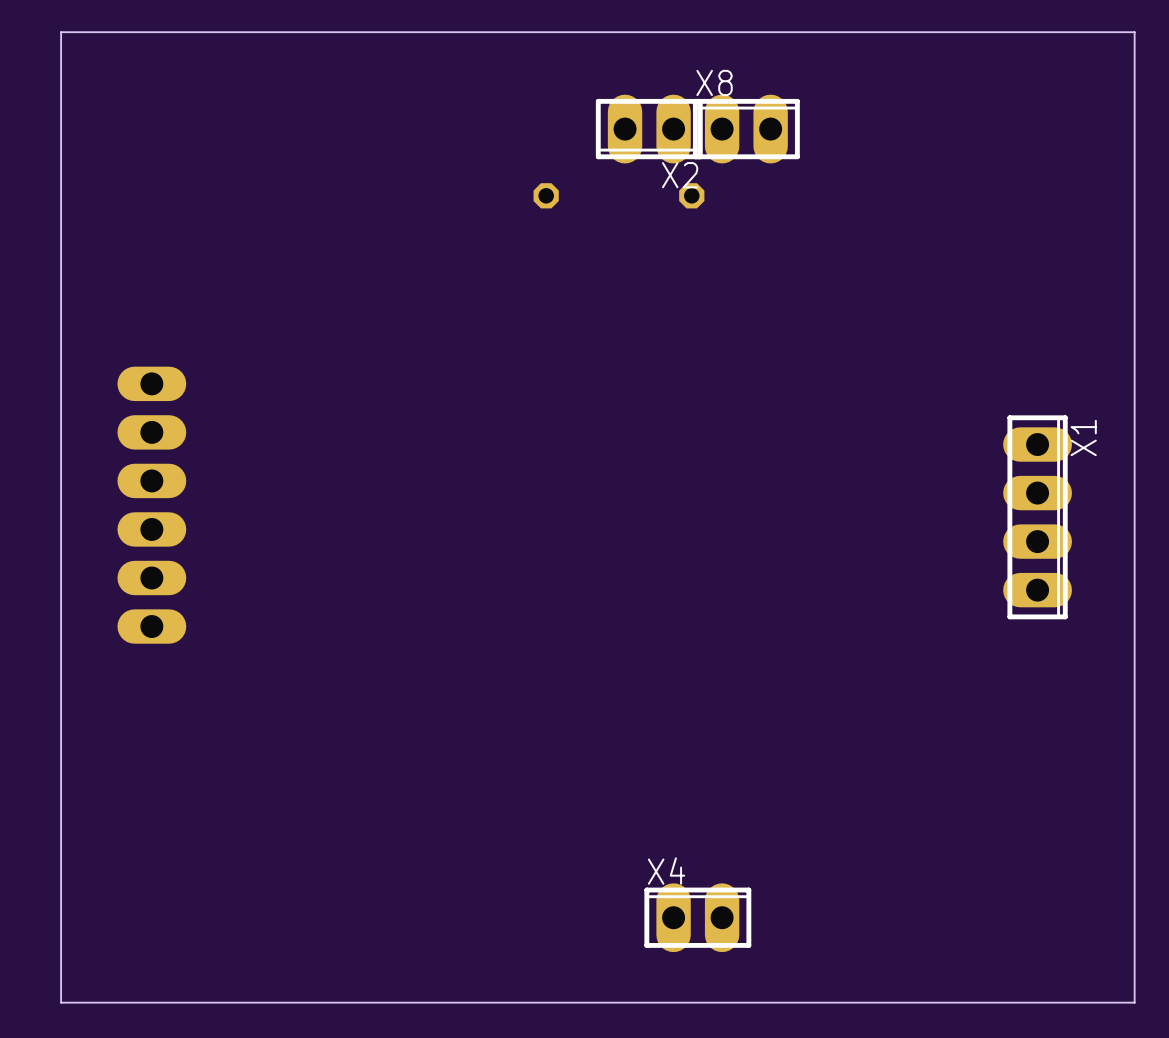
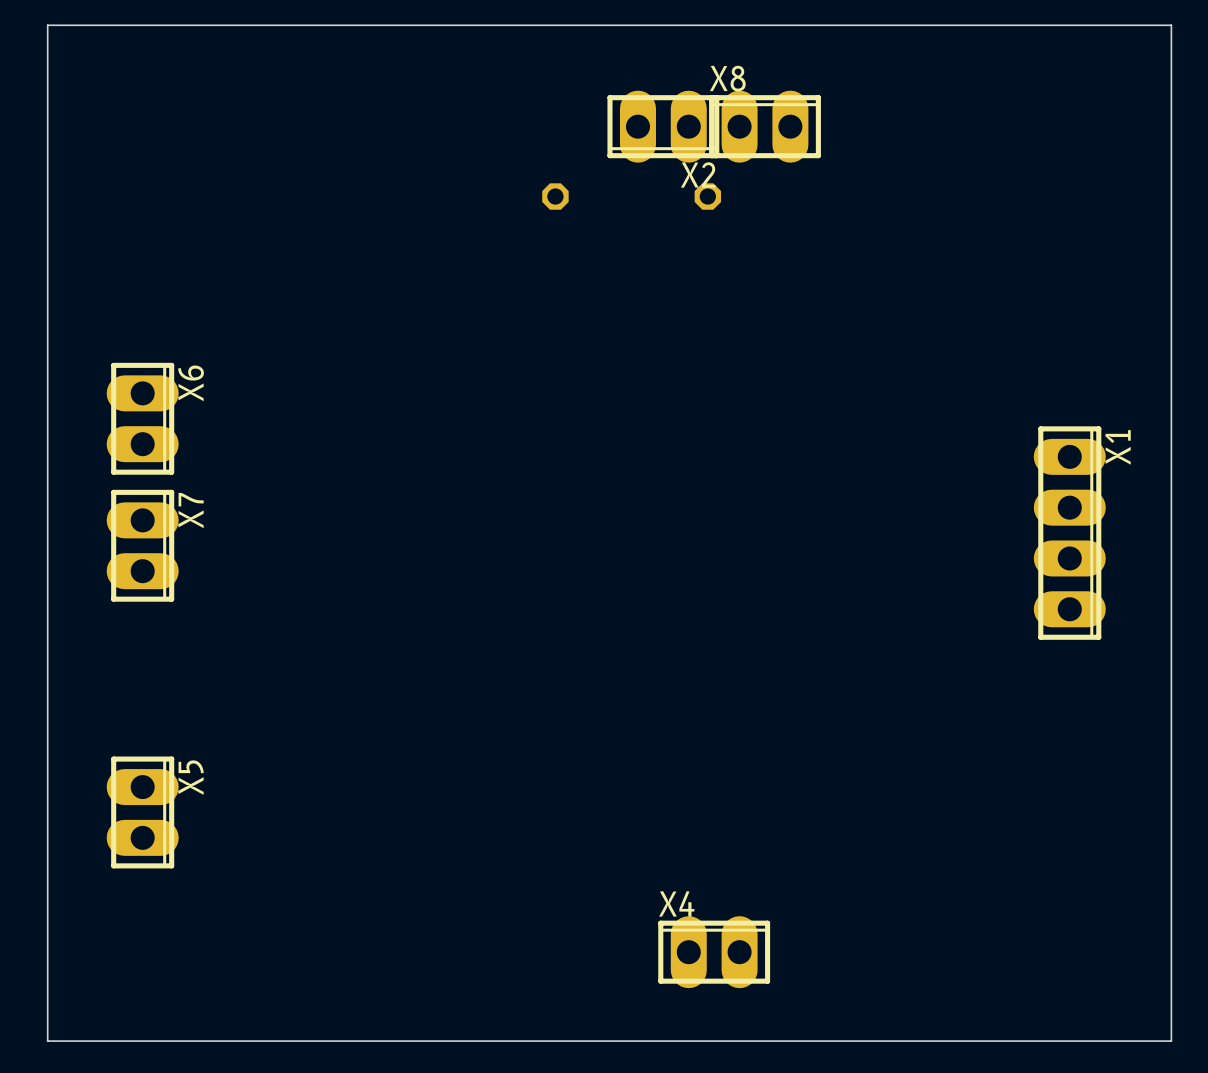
X6: none -> (142, 418)
part: (151, 505) -> none
X7: none -> (142, 545)
X5: none -> (142, 812)

